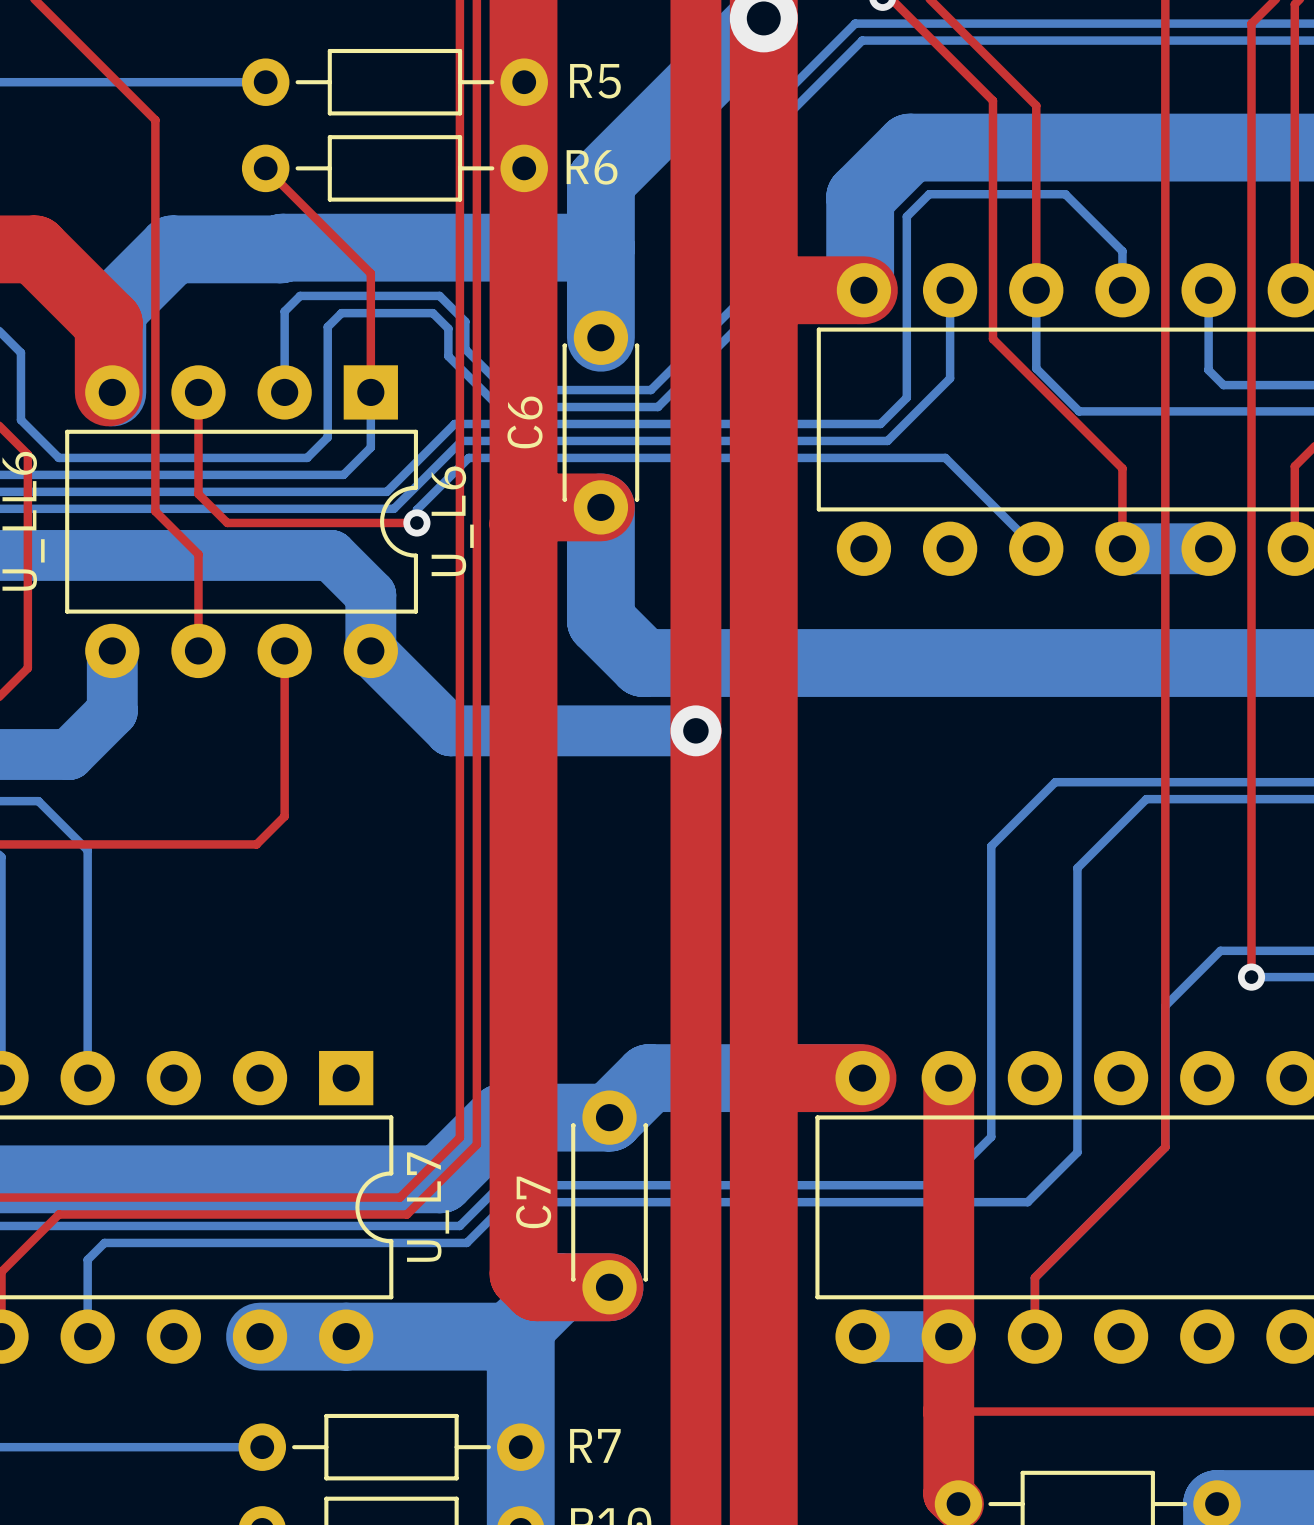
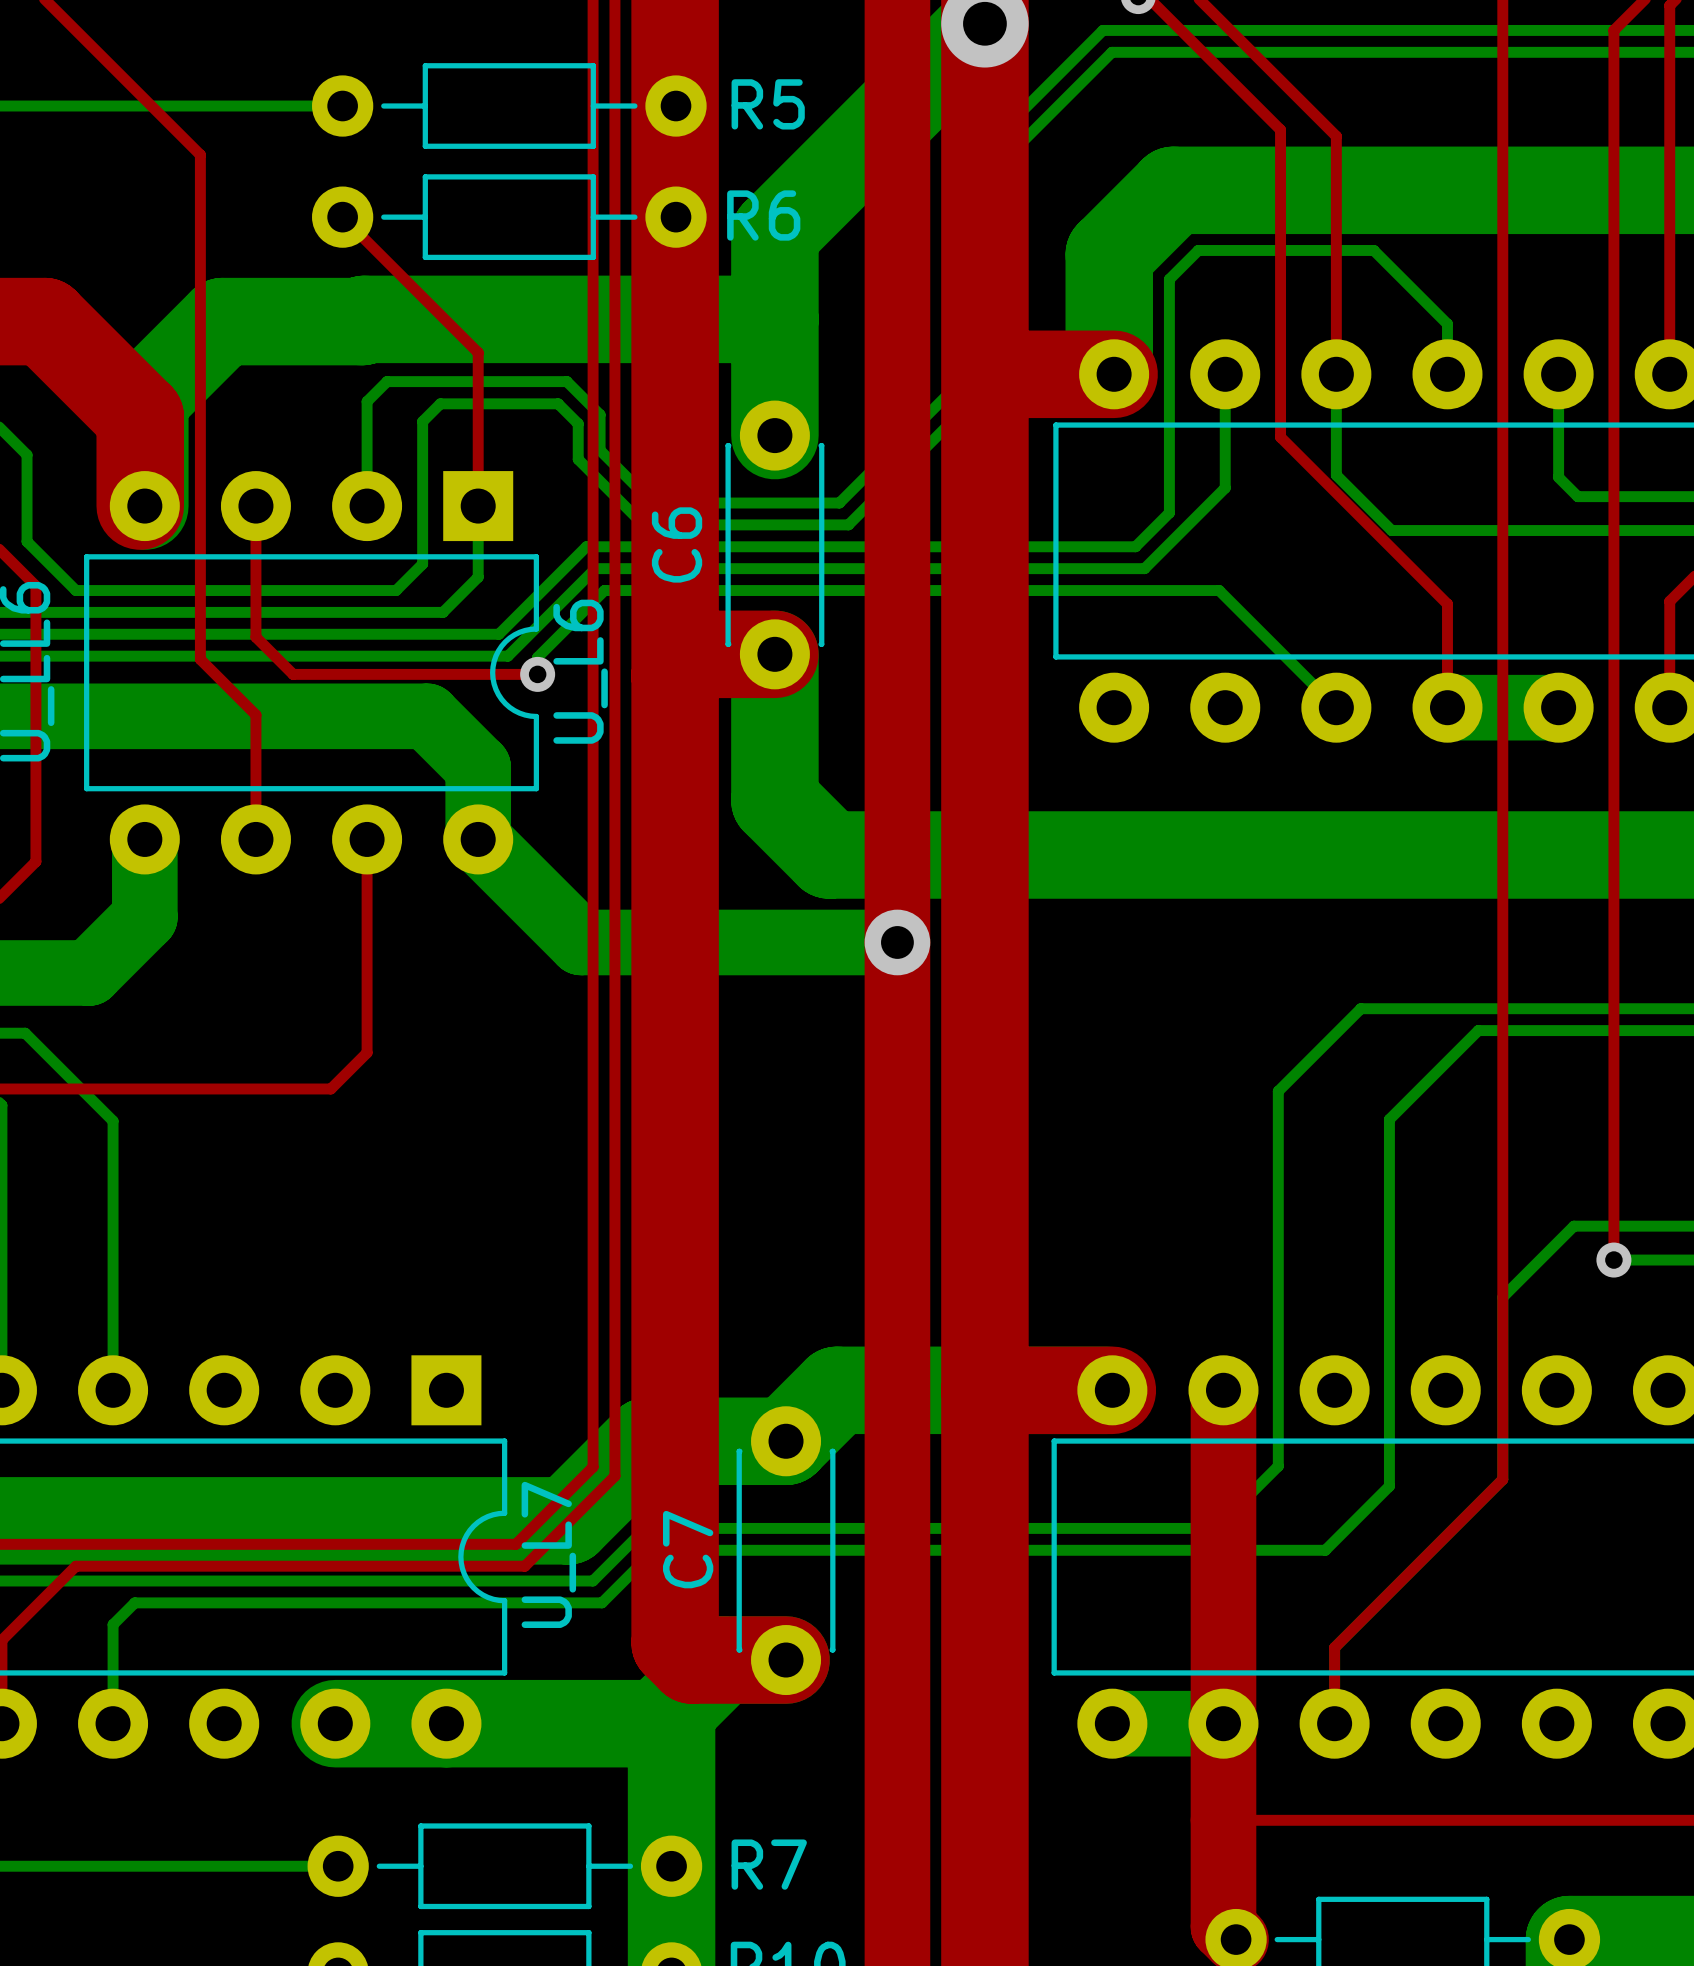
bottom track: (19, 801) (38, 801) (87, 850) (87, 869) -> (25, 1033) (113, 1121)

